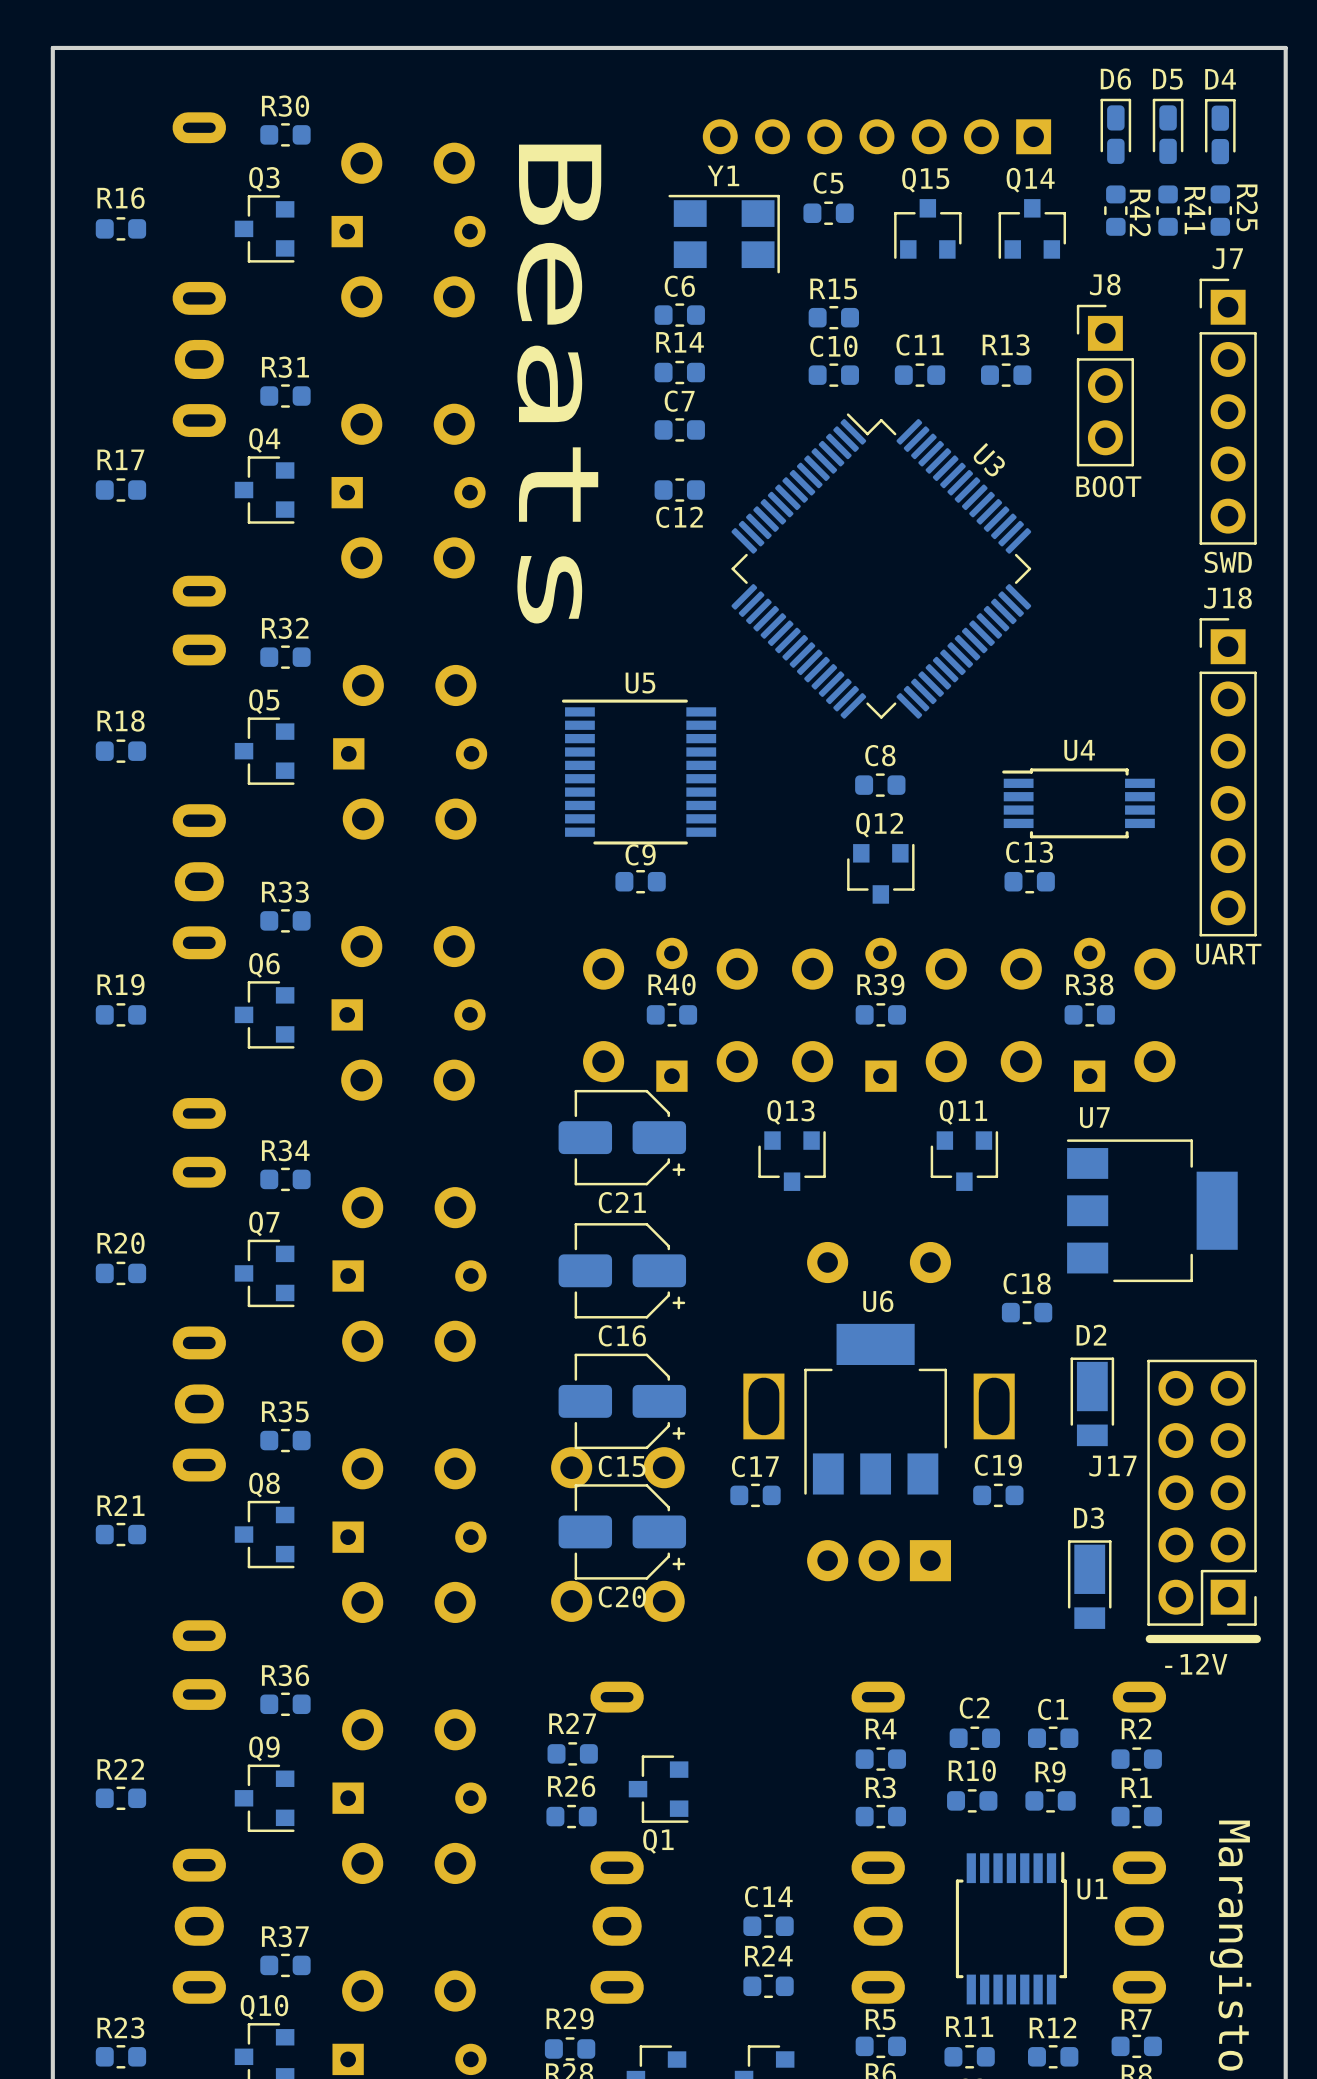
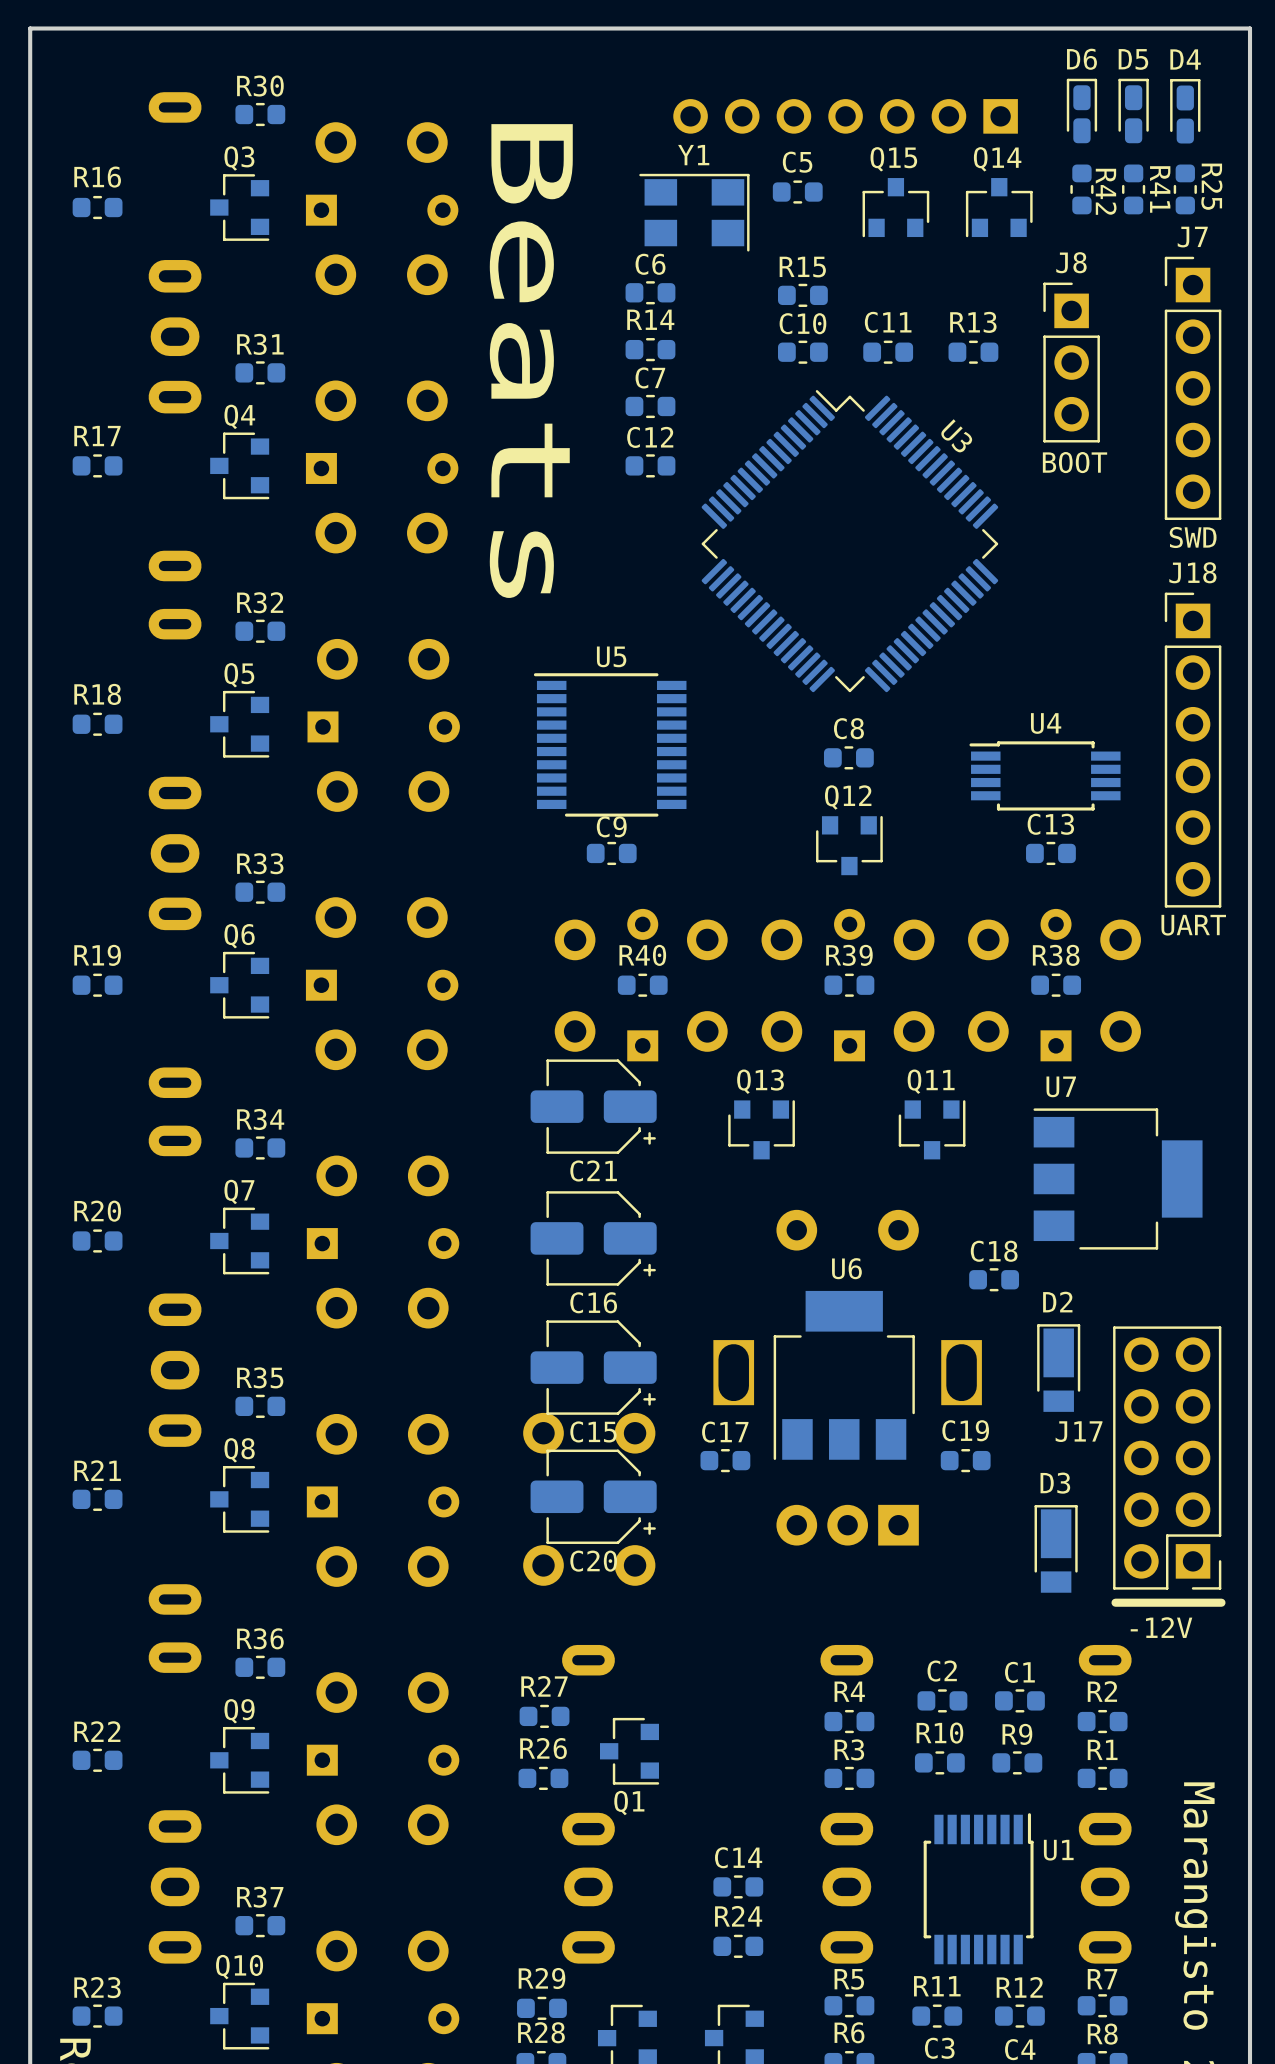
C12 name position: C12 (679, 517) -> C12 (650, 437)
C13 position: (1029, 881) -> (1050, 853)

